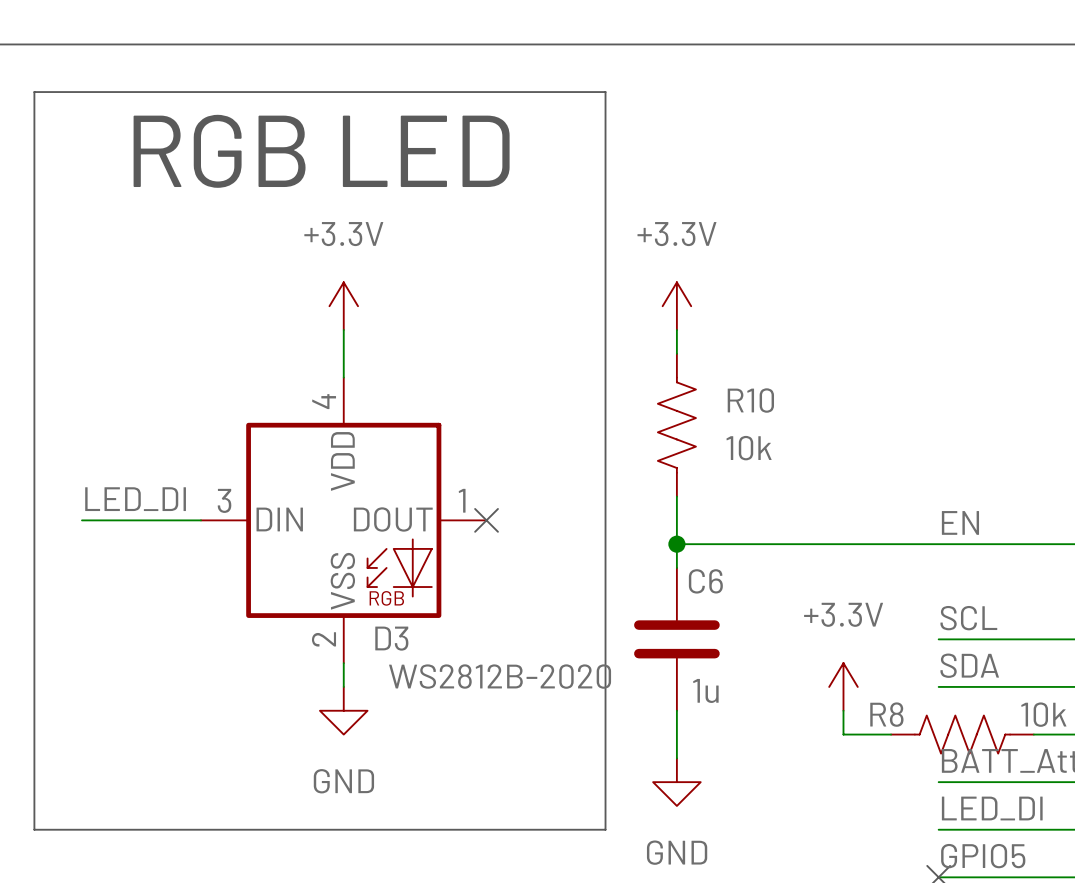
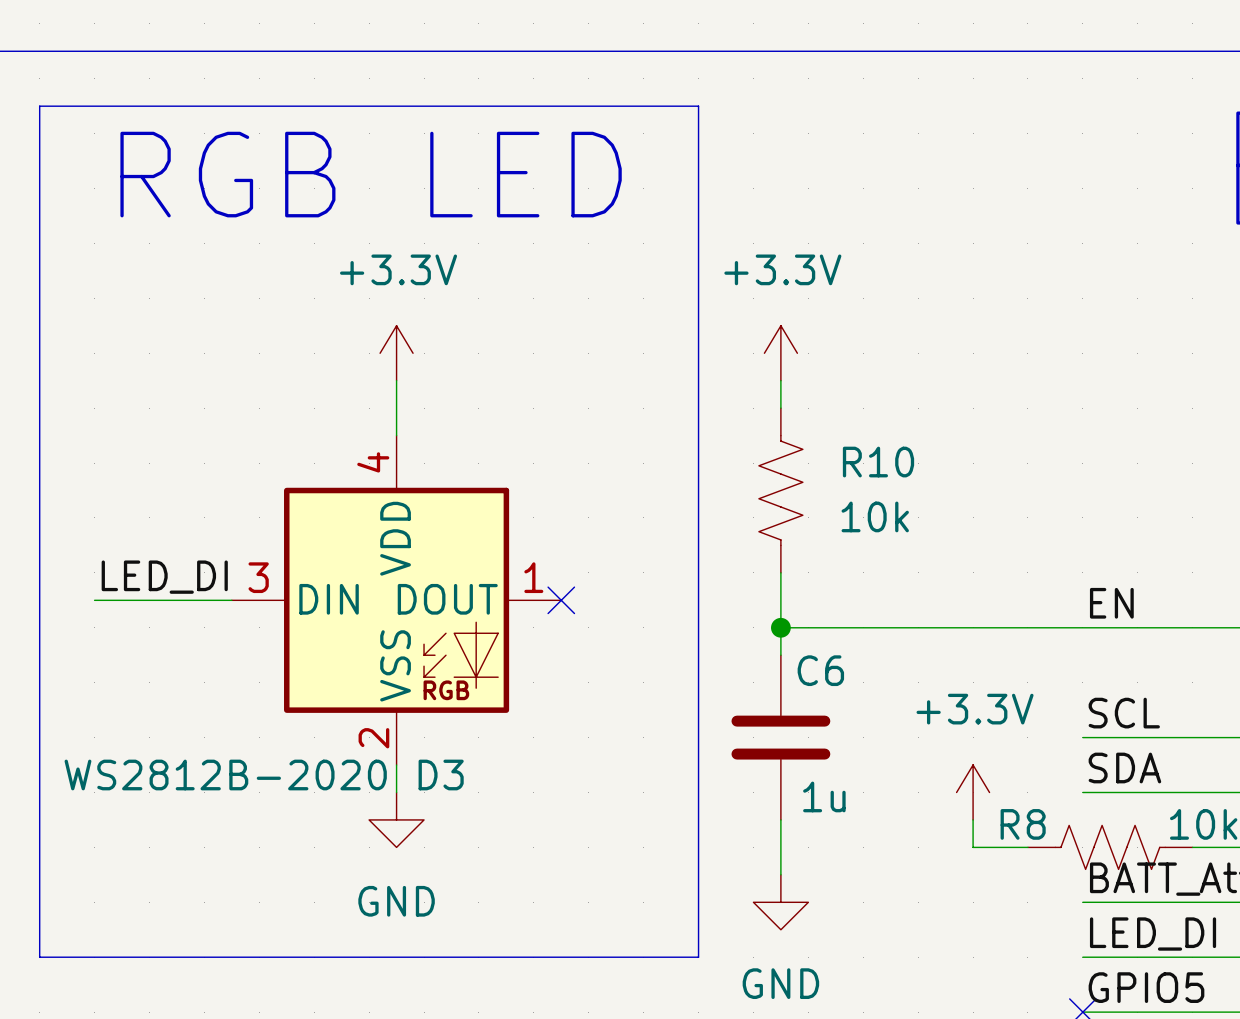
D3 name position: D3 (391, 638) -> D3 (441, 775)
D3 value position: WS2812B-2020 (500, 676) -> WS2812B-2020 (225, 775)

